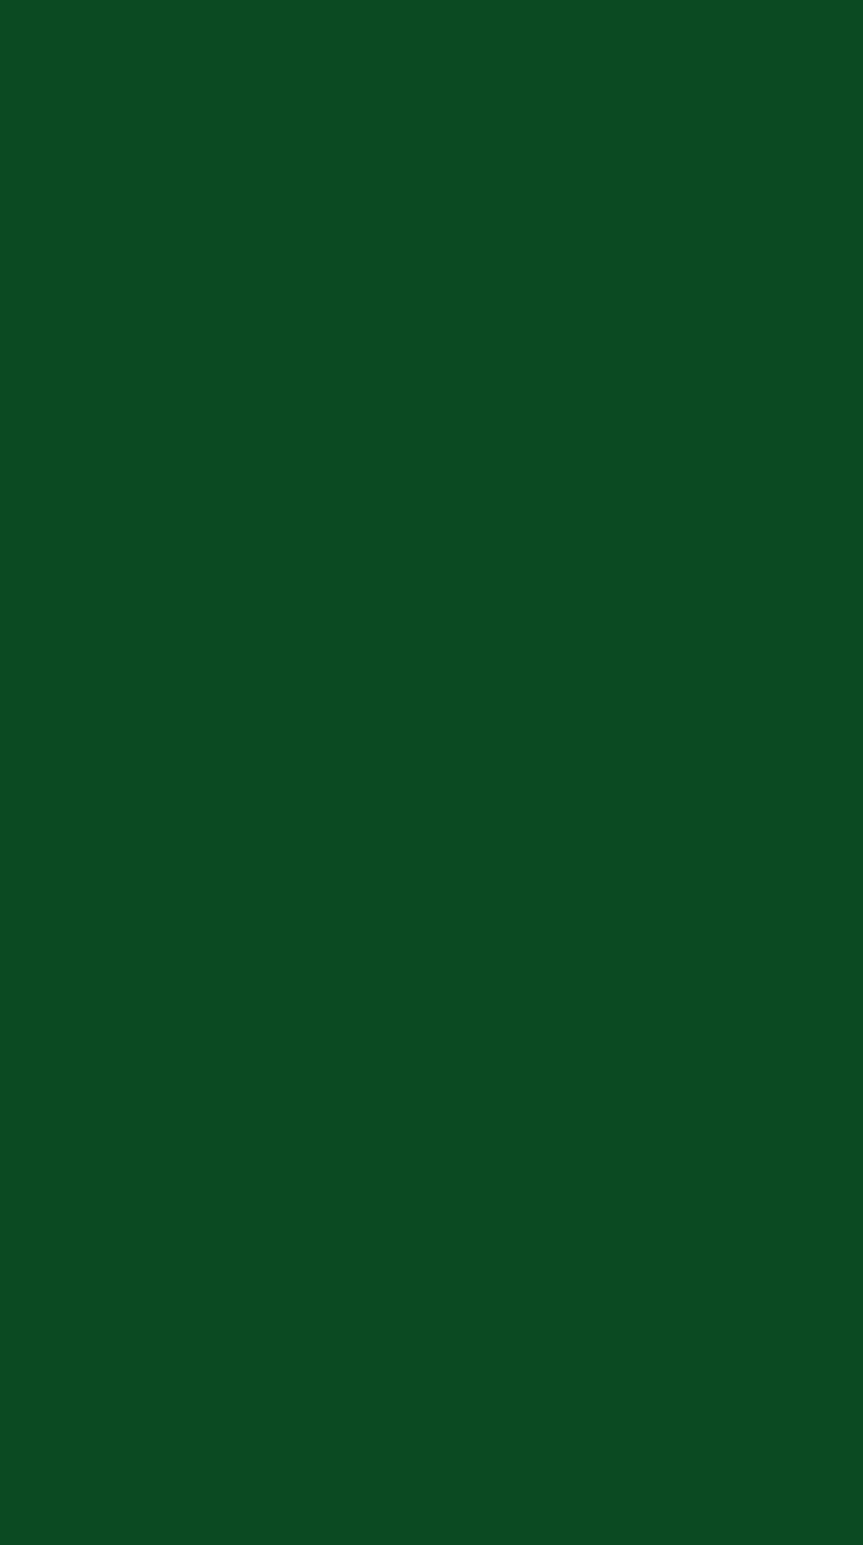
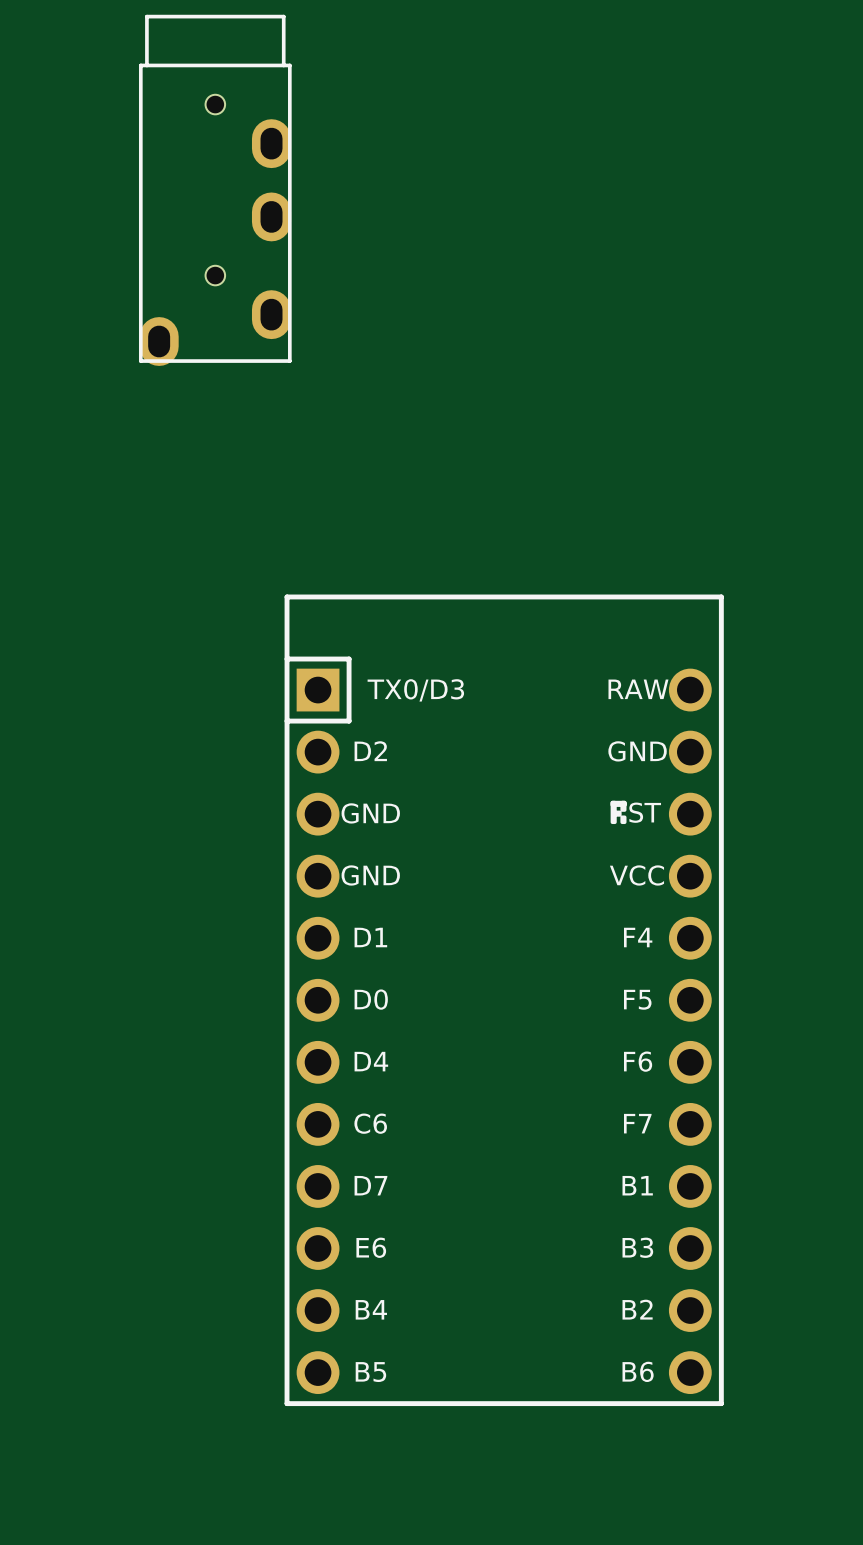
part: none -> (215, 190)
part: none -> (504, 1000)

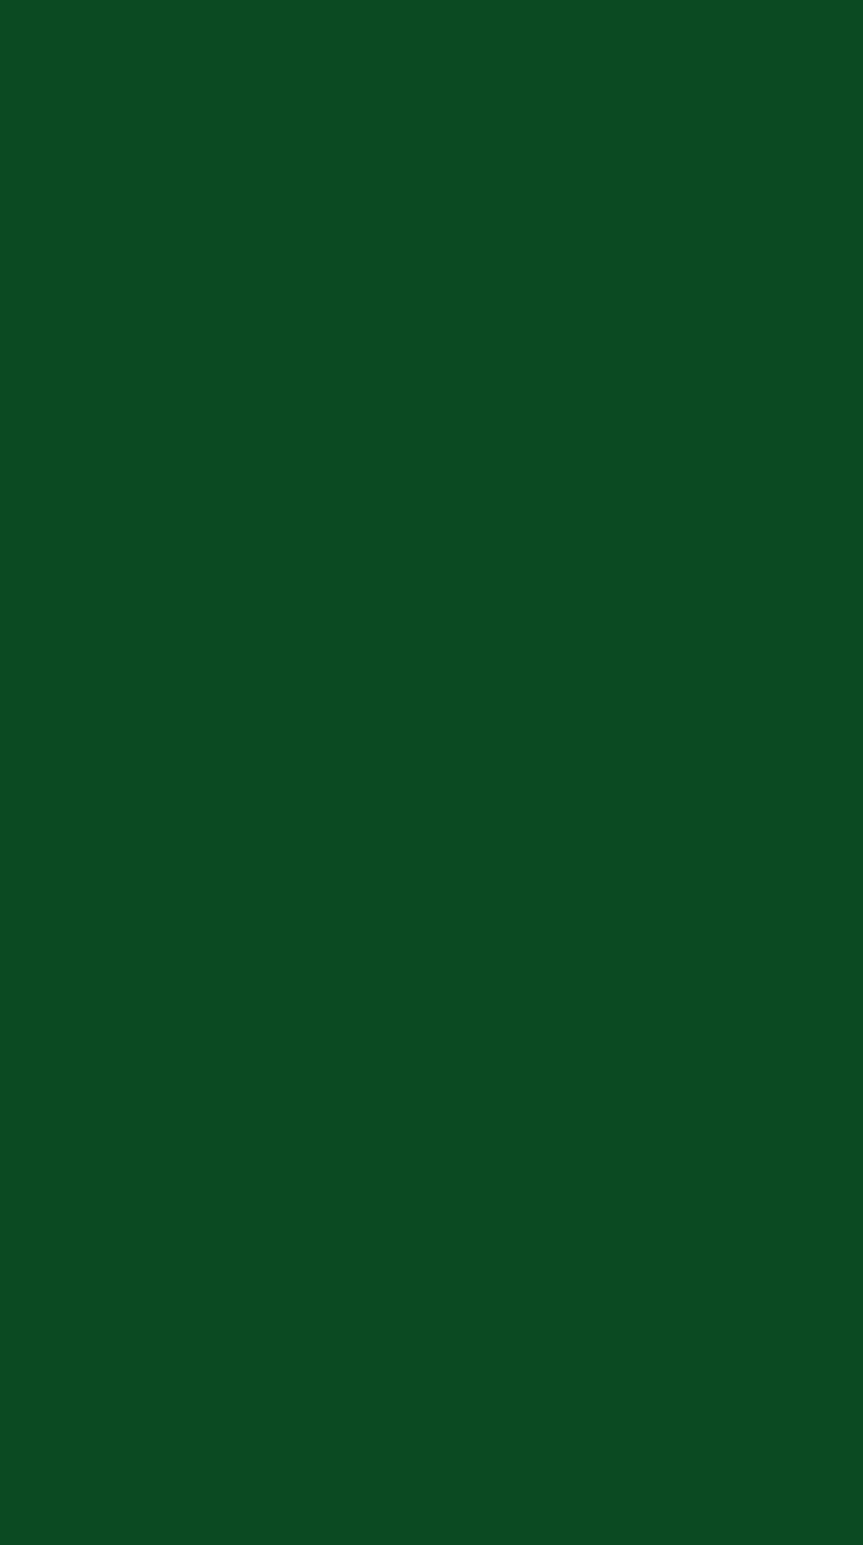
part: (215, 190) -> none
part: (504, 1000) -> none

